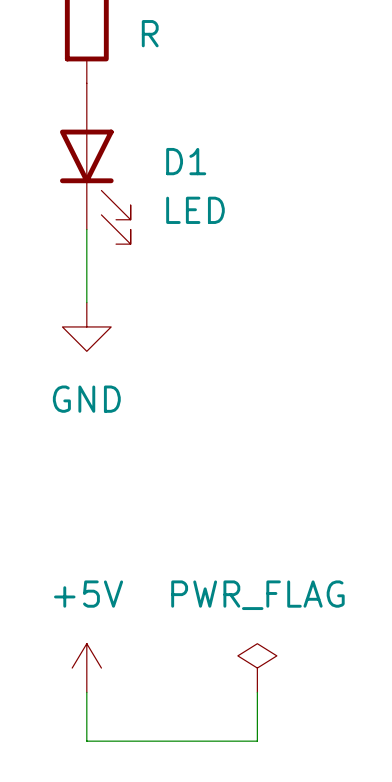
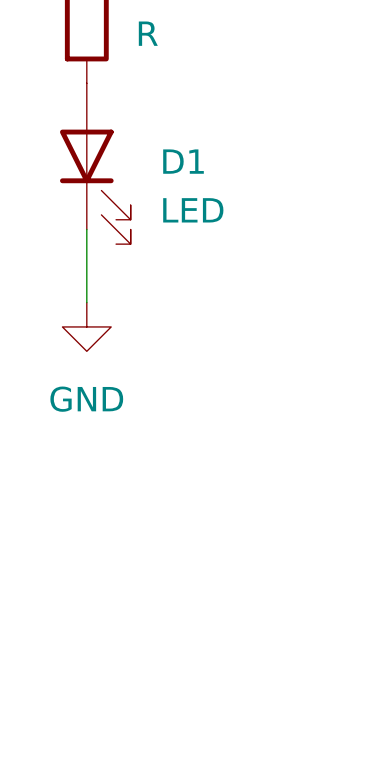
power symbol: +5V (86, 668) -> none
power symbol: PWR_FLAG (257, 668) -> none
wire: (86, 692) (86, 741) (257, 741) (257, 692) -> none

